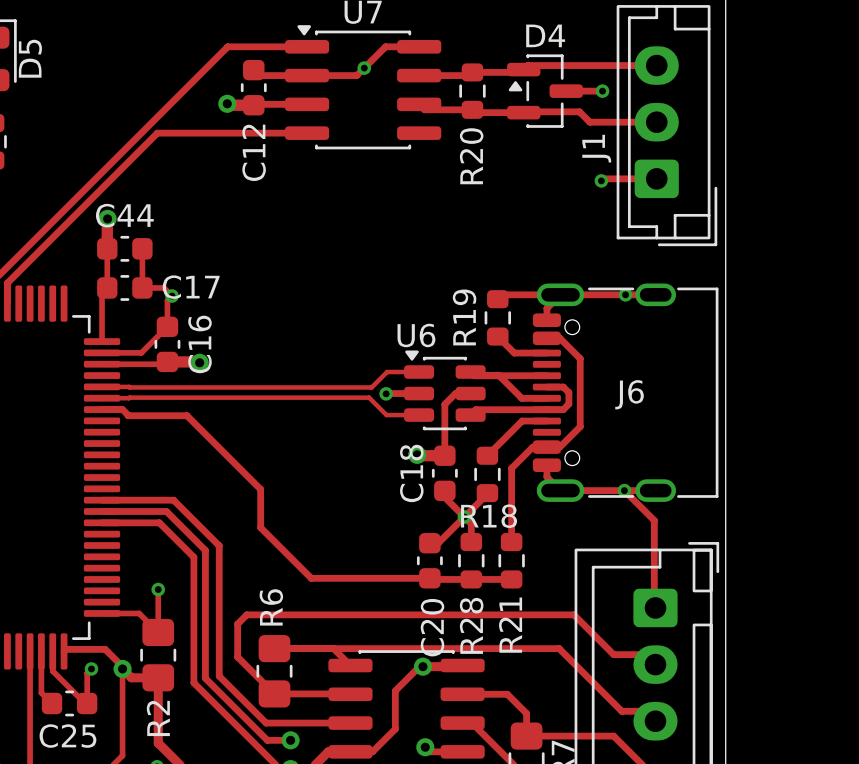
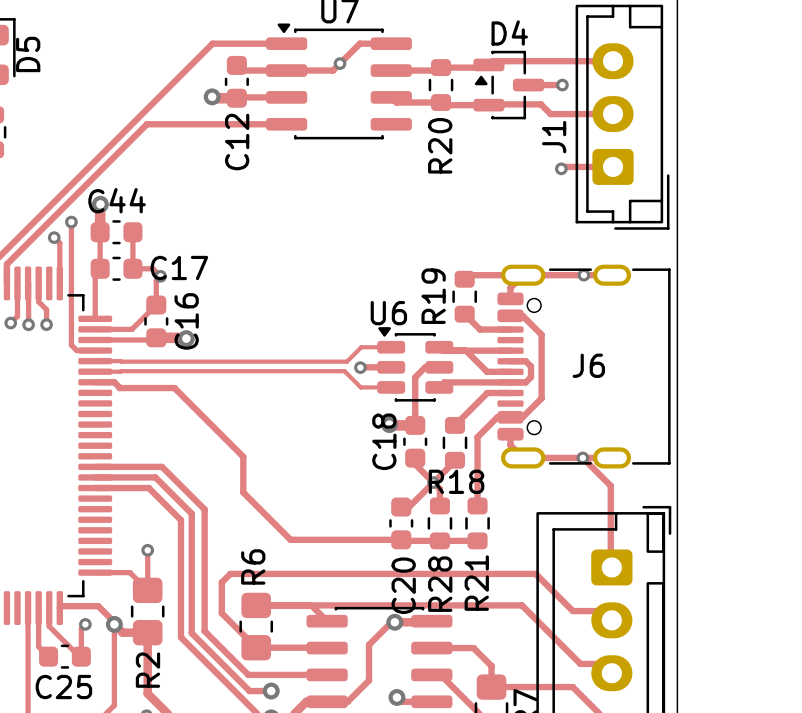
track: none -> (71, 222) (71, 345) (76, 350) (95, 350)
via: none -> (71, 222)
track: none -> (54, 237) (59, 243) (59, 283)
via: none -> (54, 237)
track: none -> (17, 283) (17, 316) (10, 323)
track: none -> (28, 283) (28, 324)
track: none -> (38, 283) (38, 301) (46, 309) (46, 324)
via: none -> (10, 323)
via: none -> (28, 324)
via: none -> (46, 324)

